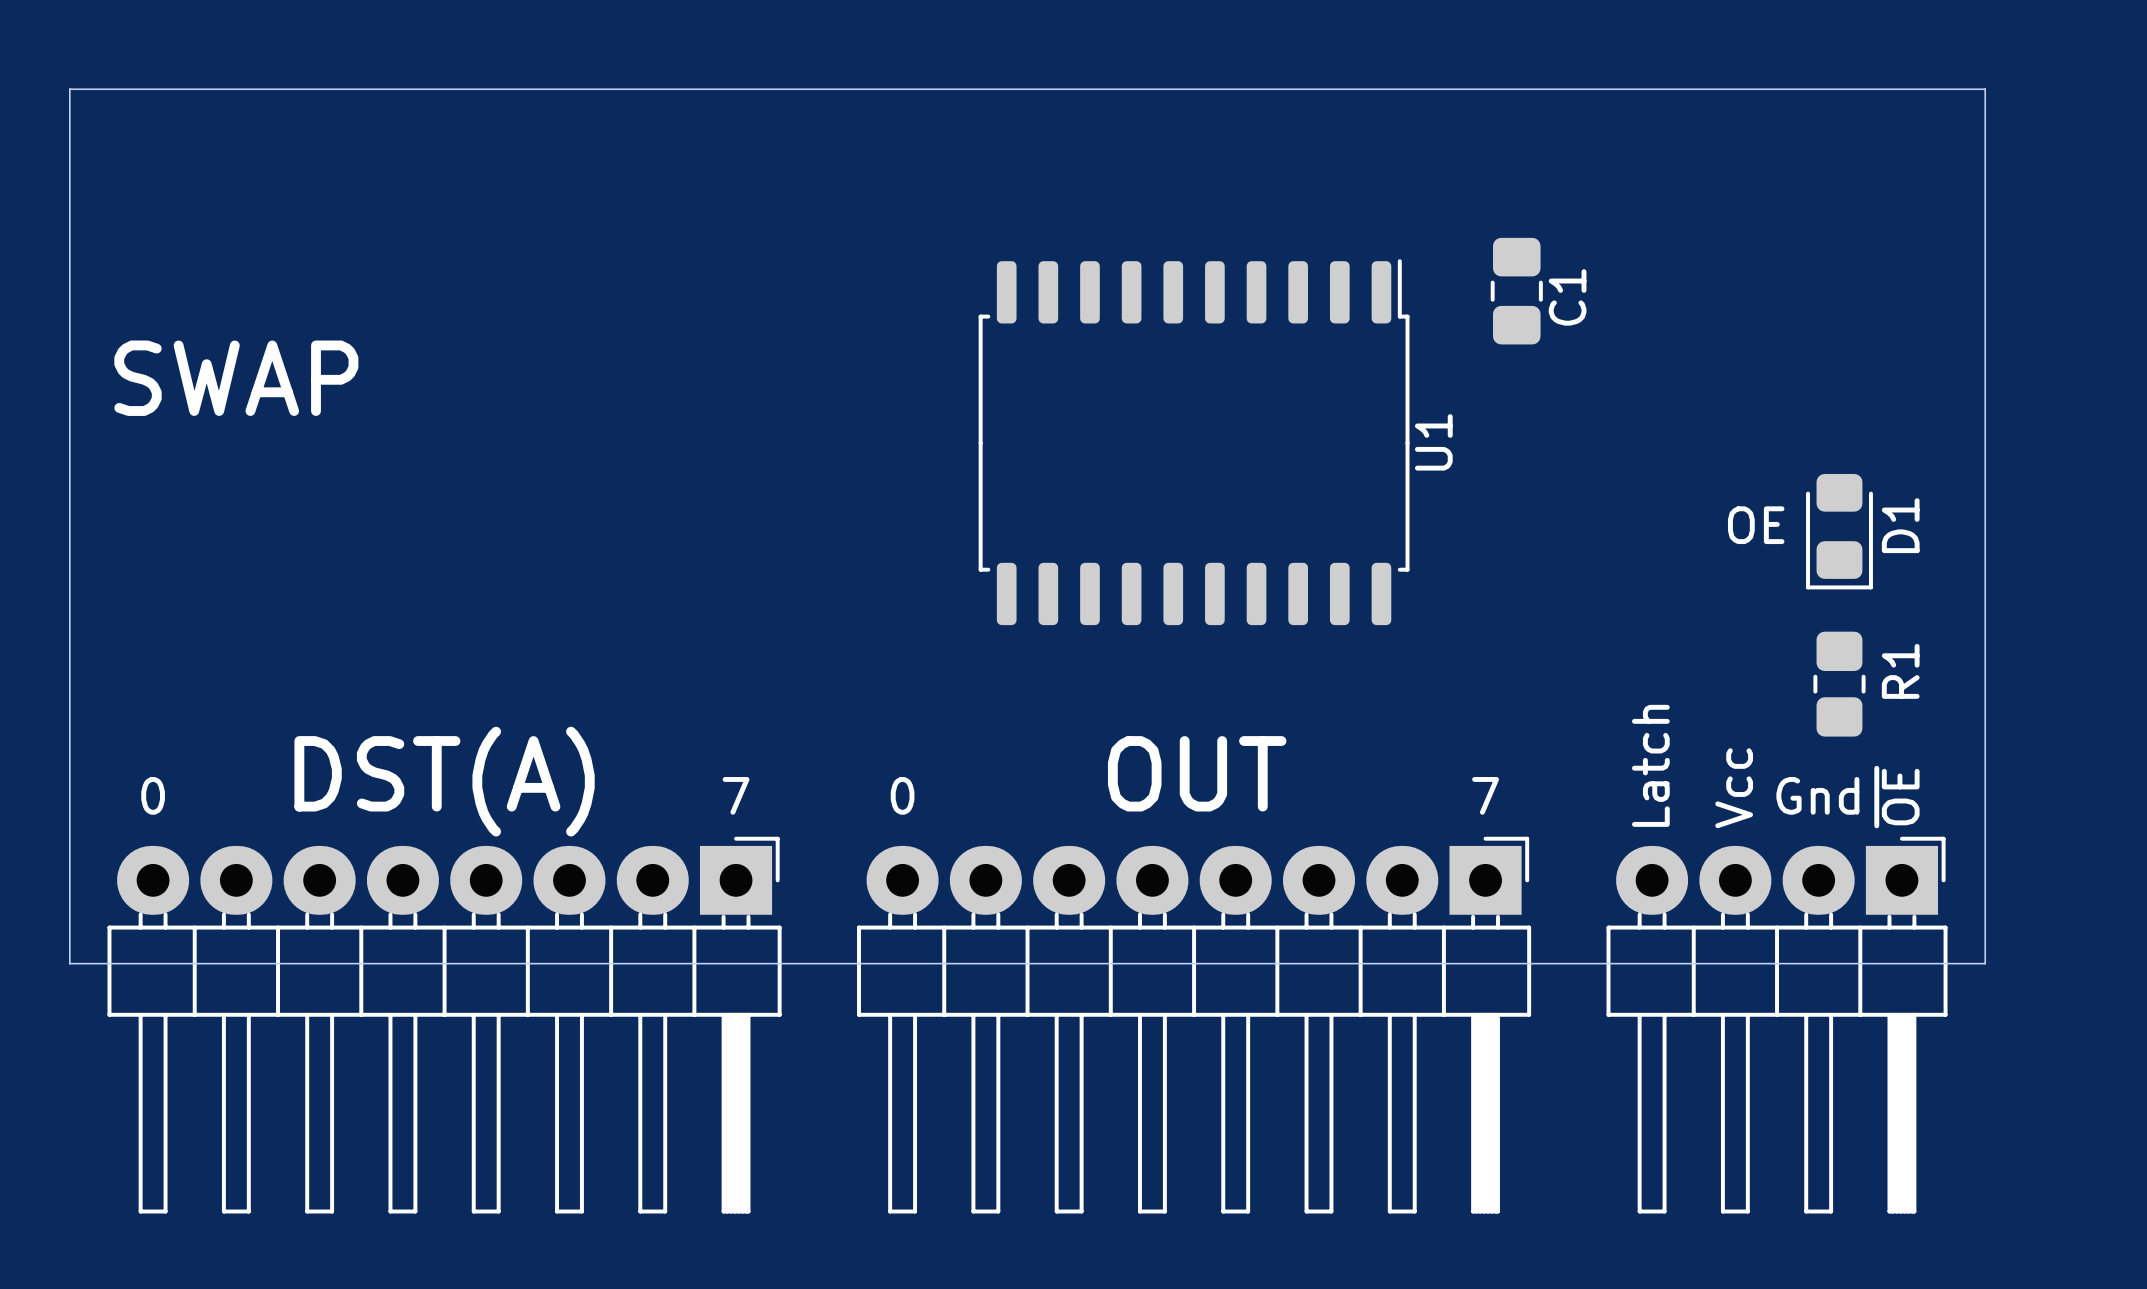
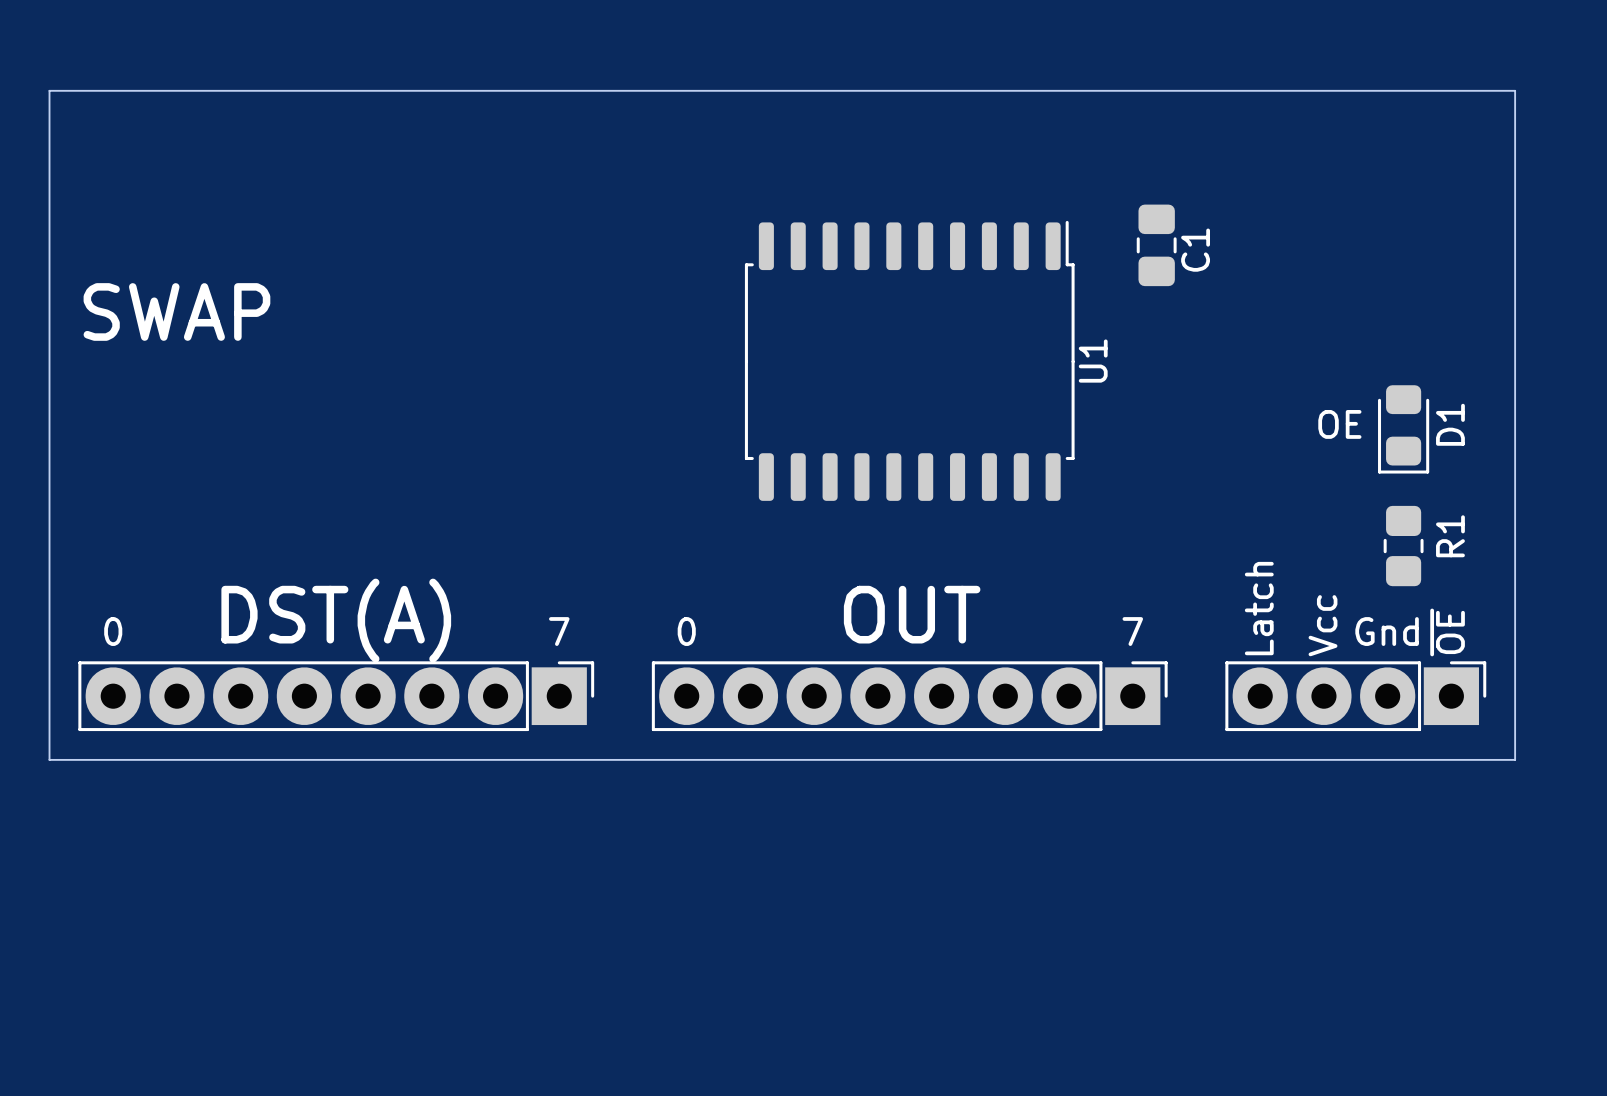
part: none -> (336, 696)
part: none -> (909, 696)
part: none -> (1355, 696)
part: (444, 1025) -> none
part: (1194, 1025) -> none
part: (1777, 1025) -> none

